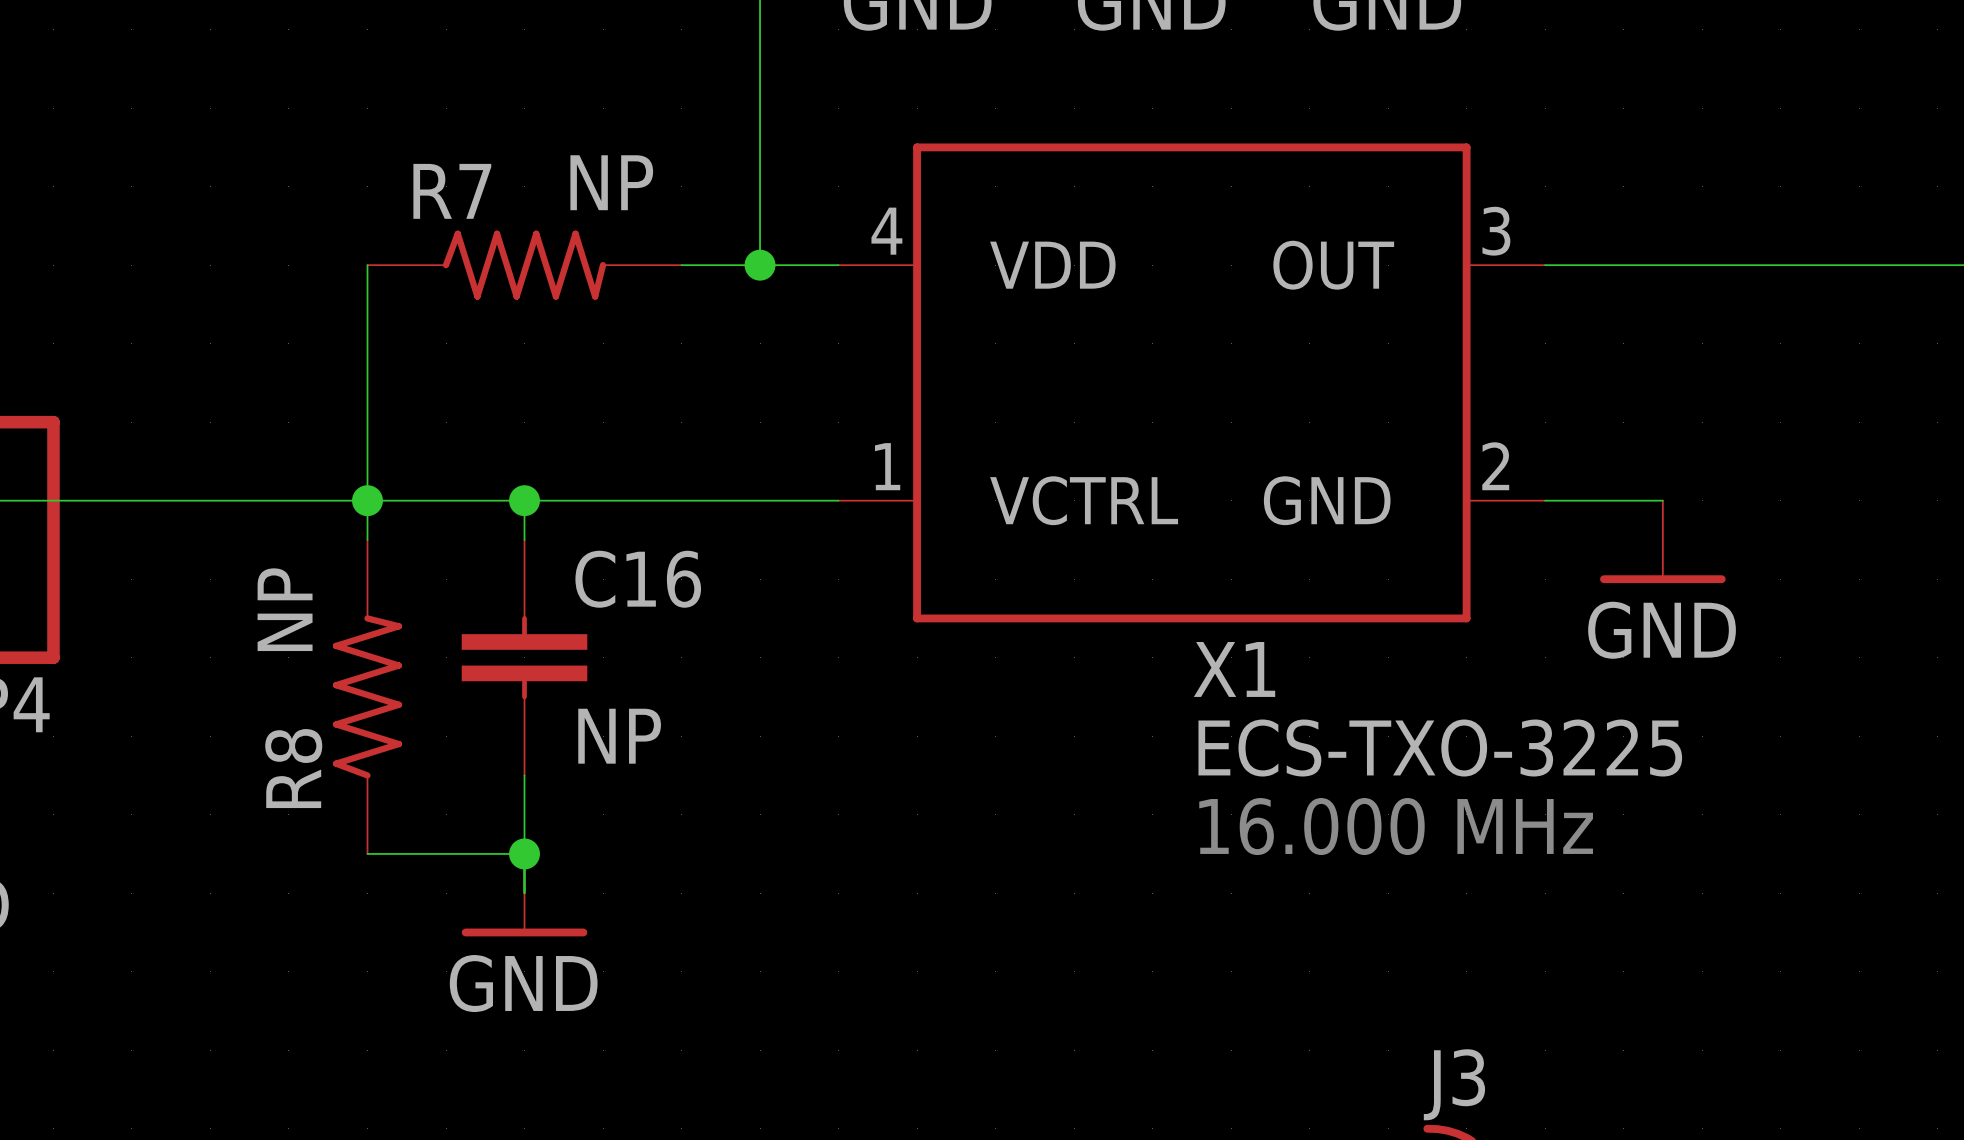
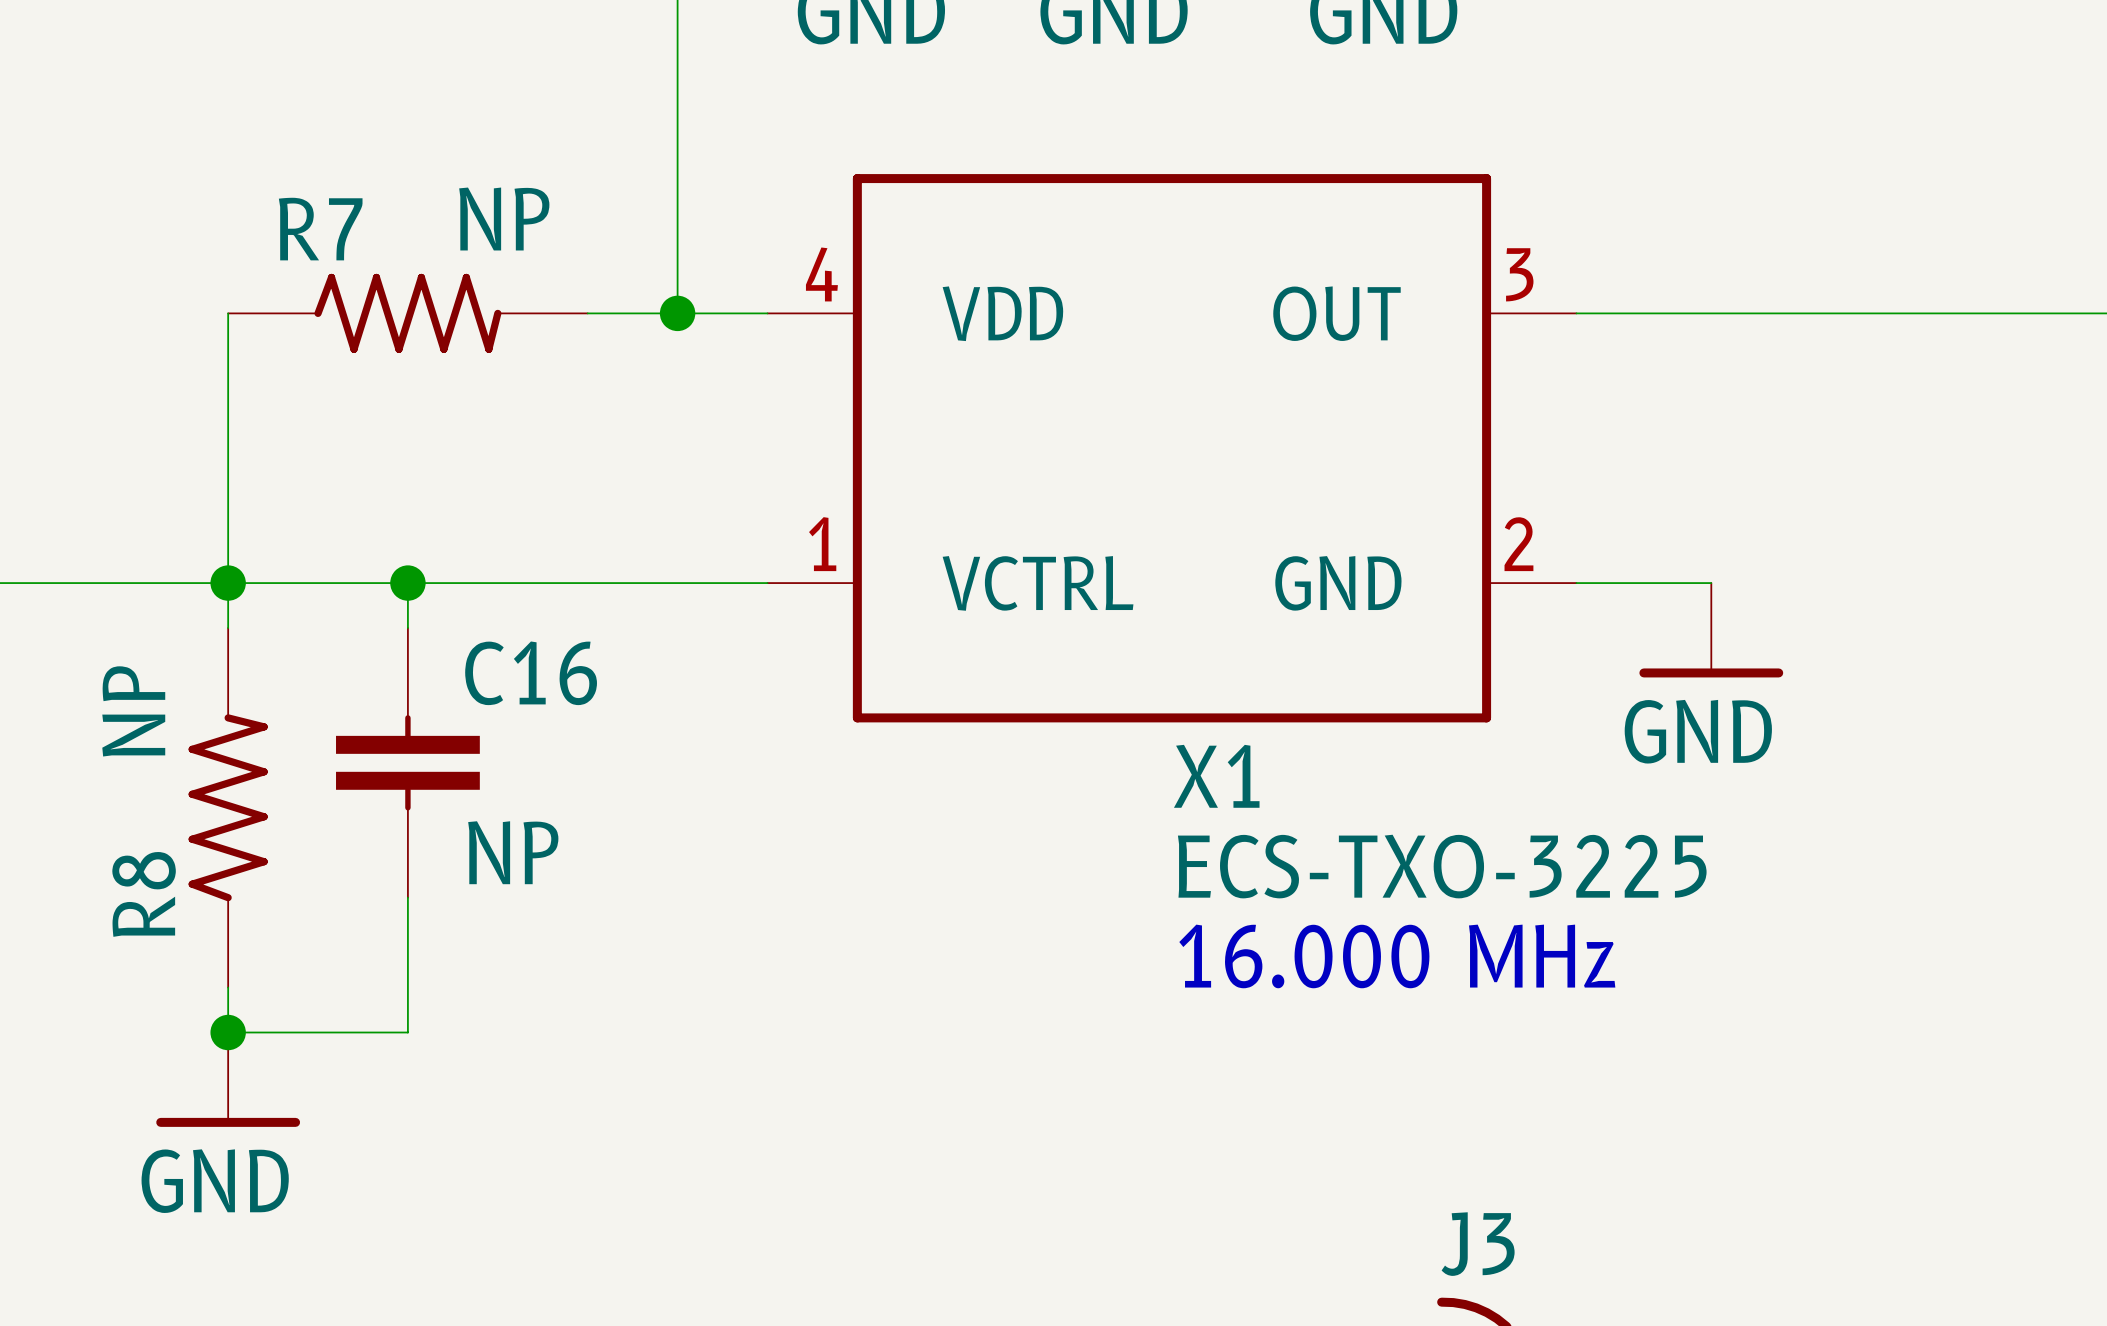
wire: (367, 853) (524, 853) -> (228, 987) (228, 1032) (407, 1032)
junction position: (524, 853) -> (228, 1032)
power symbol position: GND (524, 895) -> GND (228, 1079)

